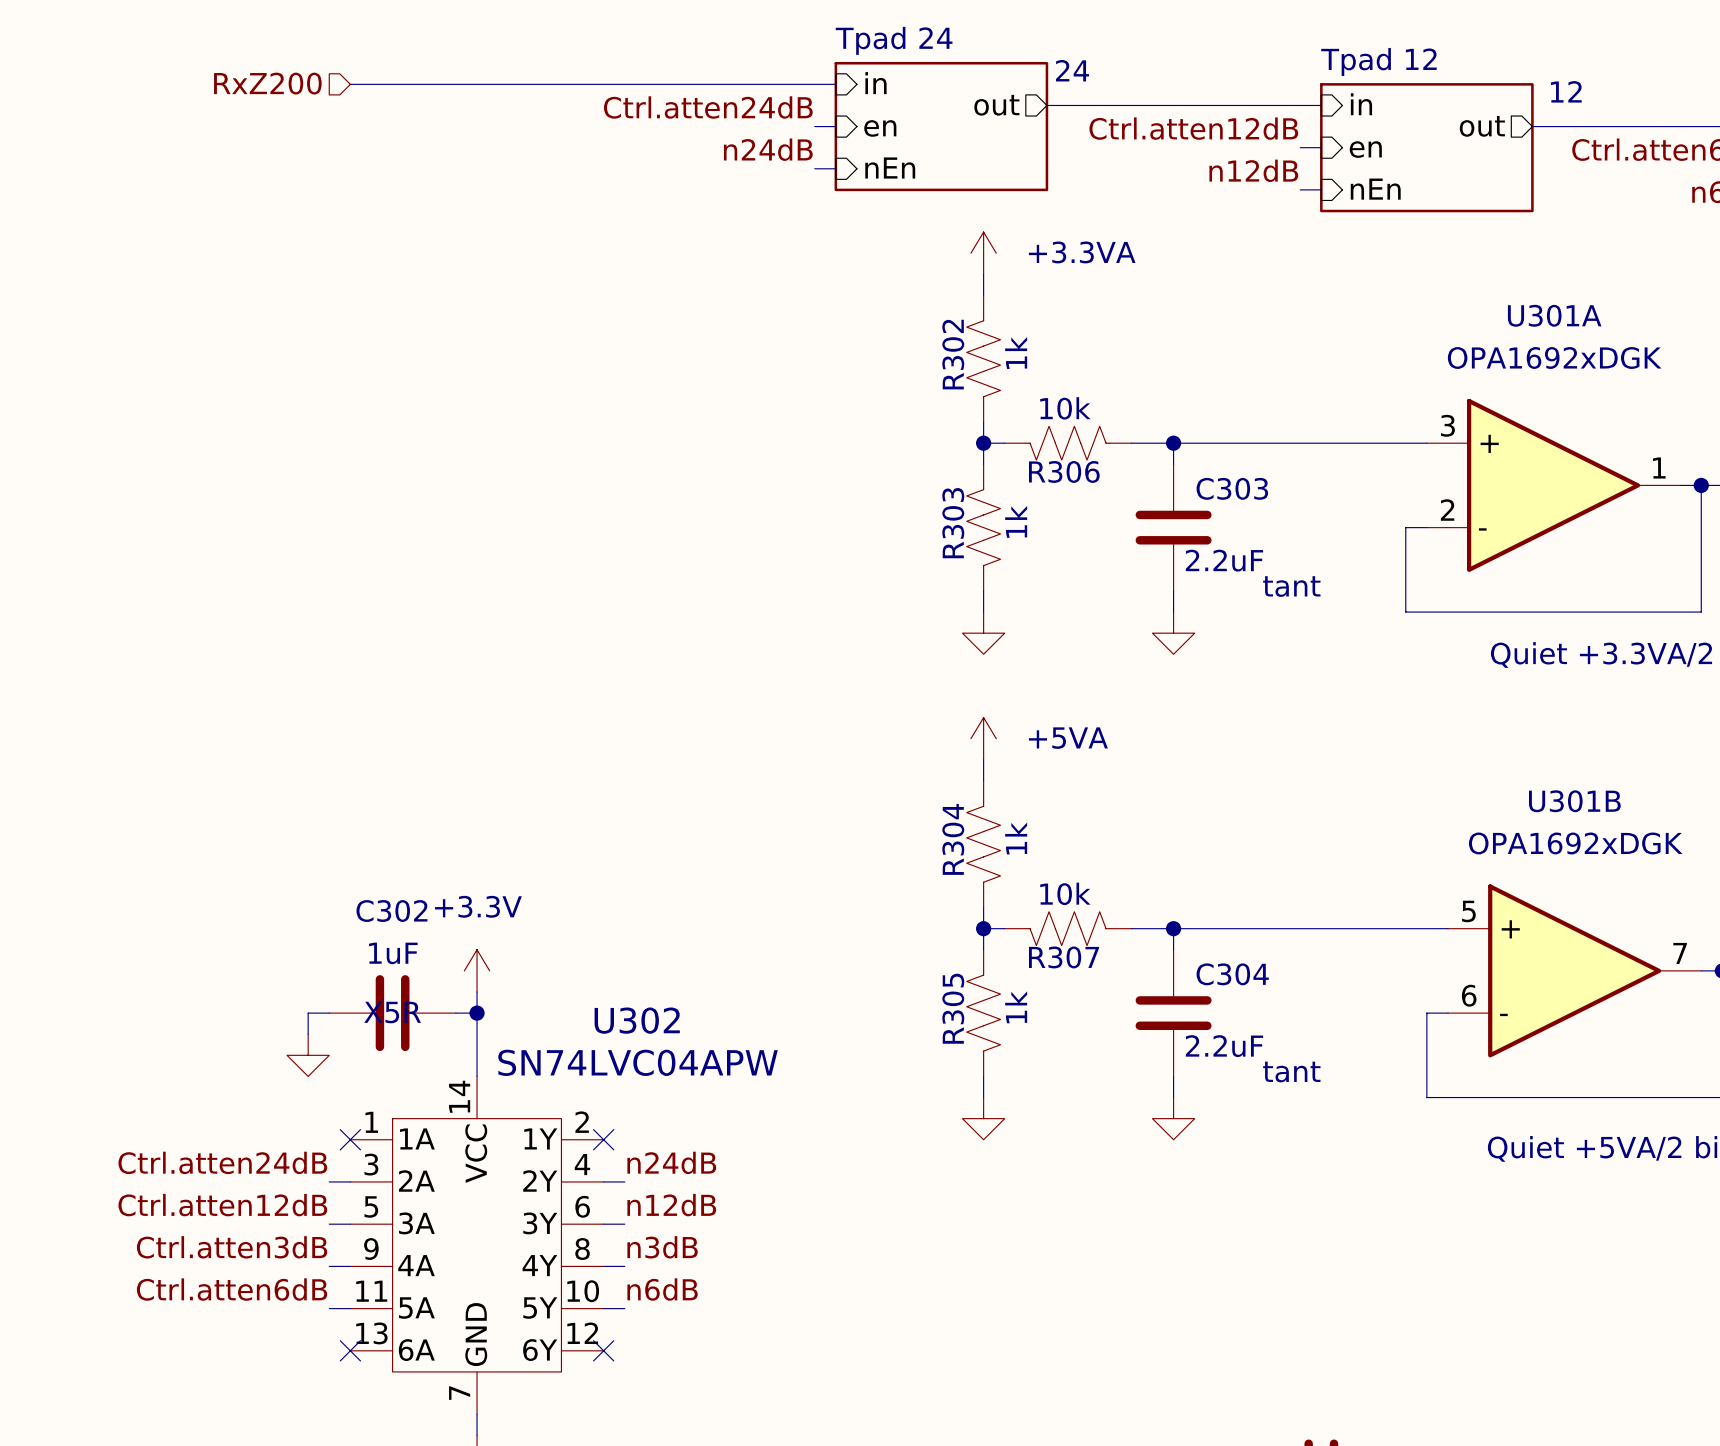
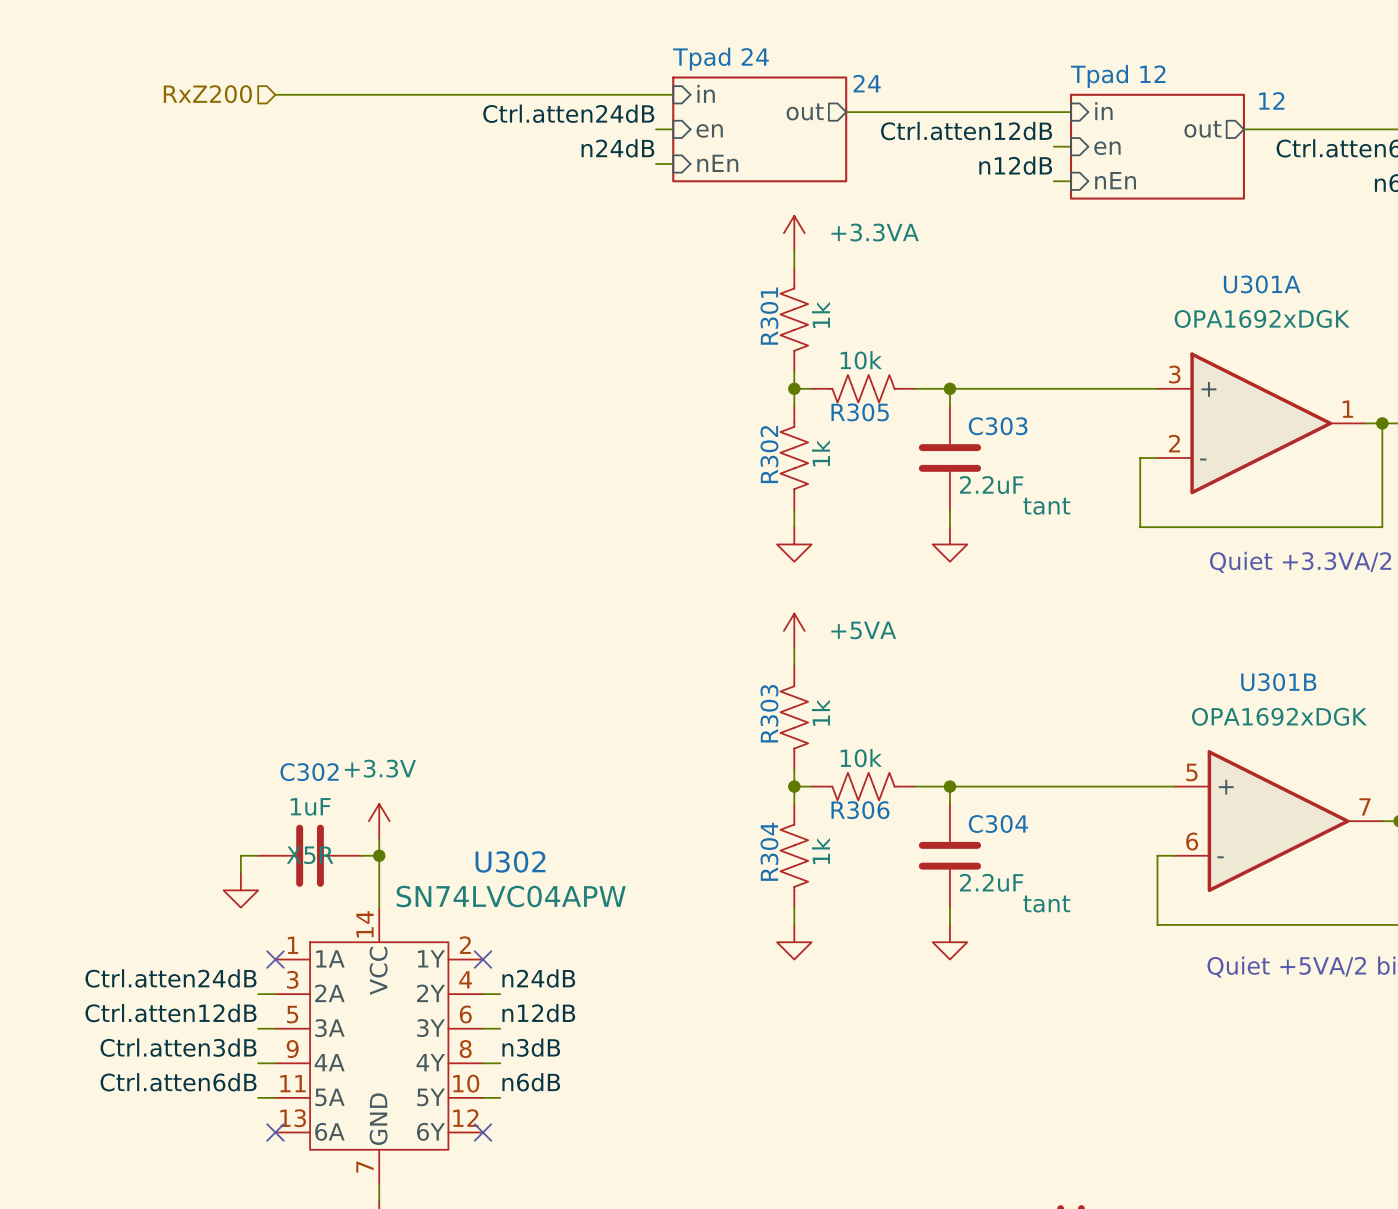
R302 name: R302 (953, 354) -> R301 (769, 316)
R306 name: R306 (1064, 471) -> R305 (860, 412)
R303 name: R303 (953, 523) -> R302 (769, 454)
R304 name: R304 (953, 839) -> R303 (769, 713)
R307 name: R307 (1064, 957) -> R306 (860, 810)
R305 name: R305 (953, 1008) -> R304 (769, 851)

